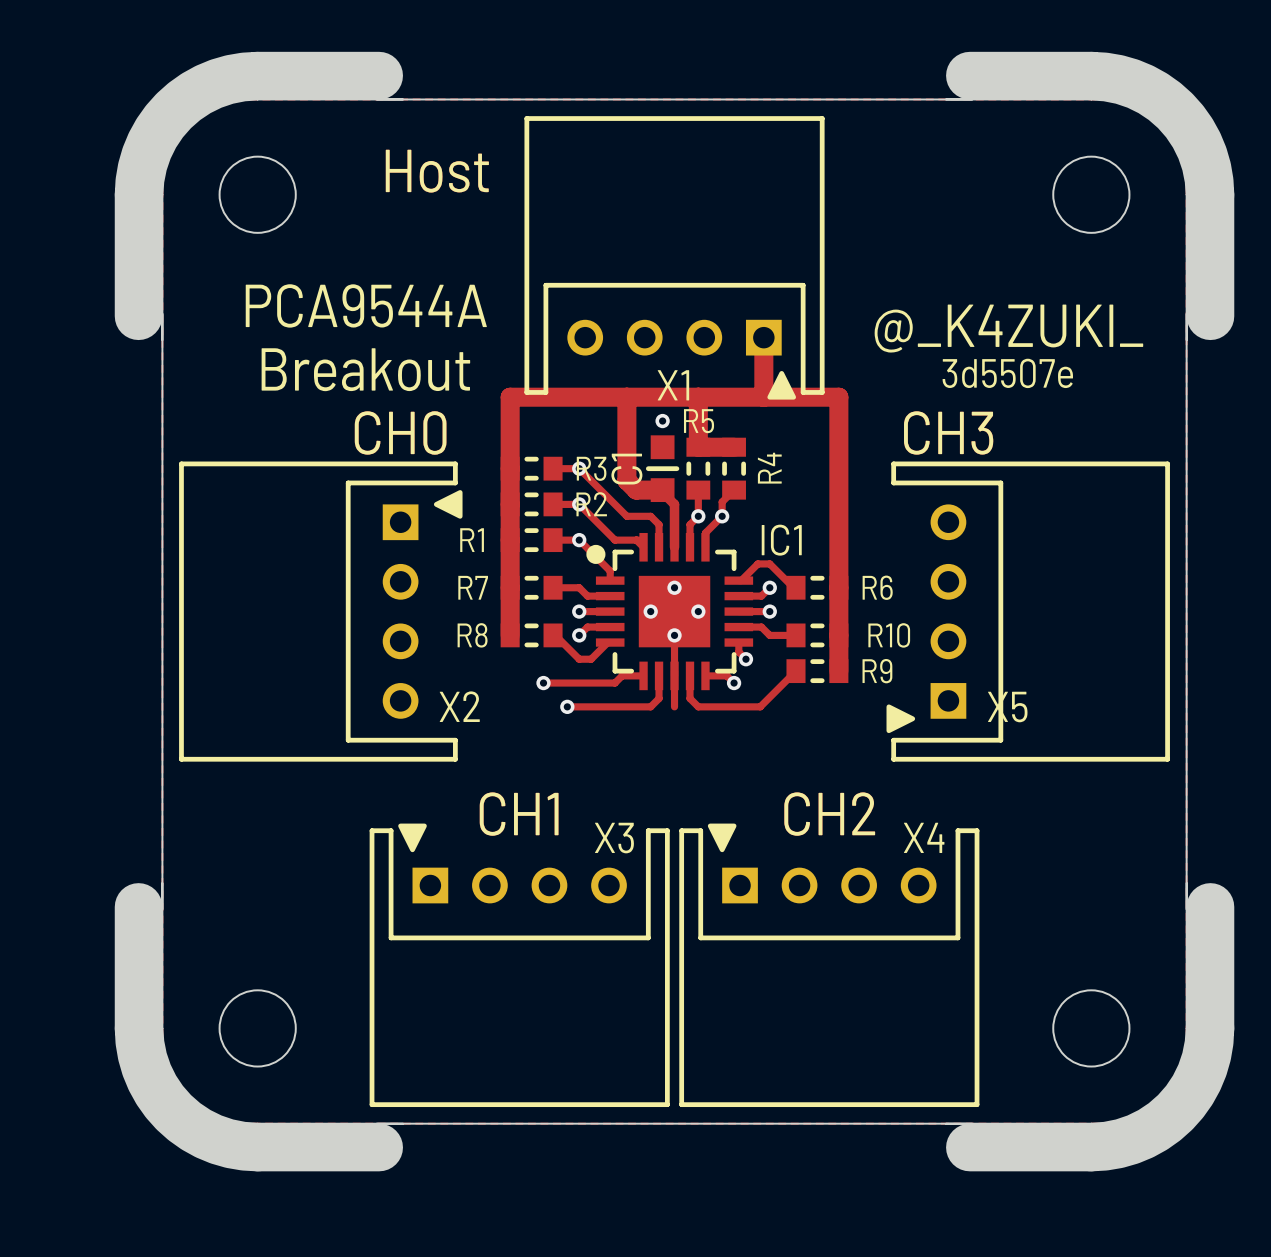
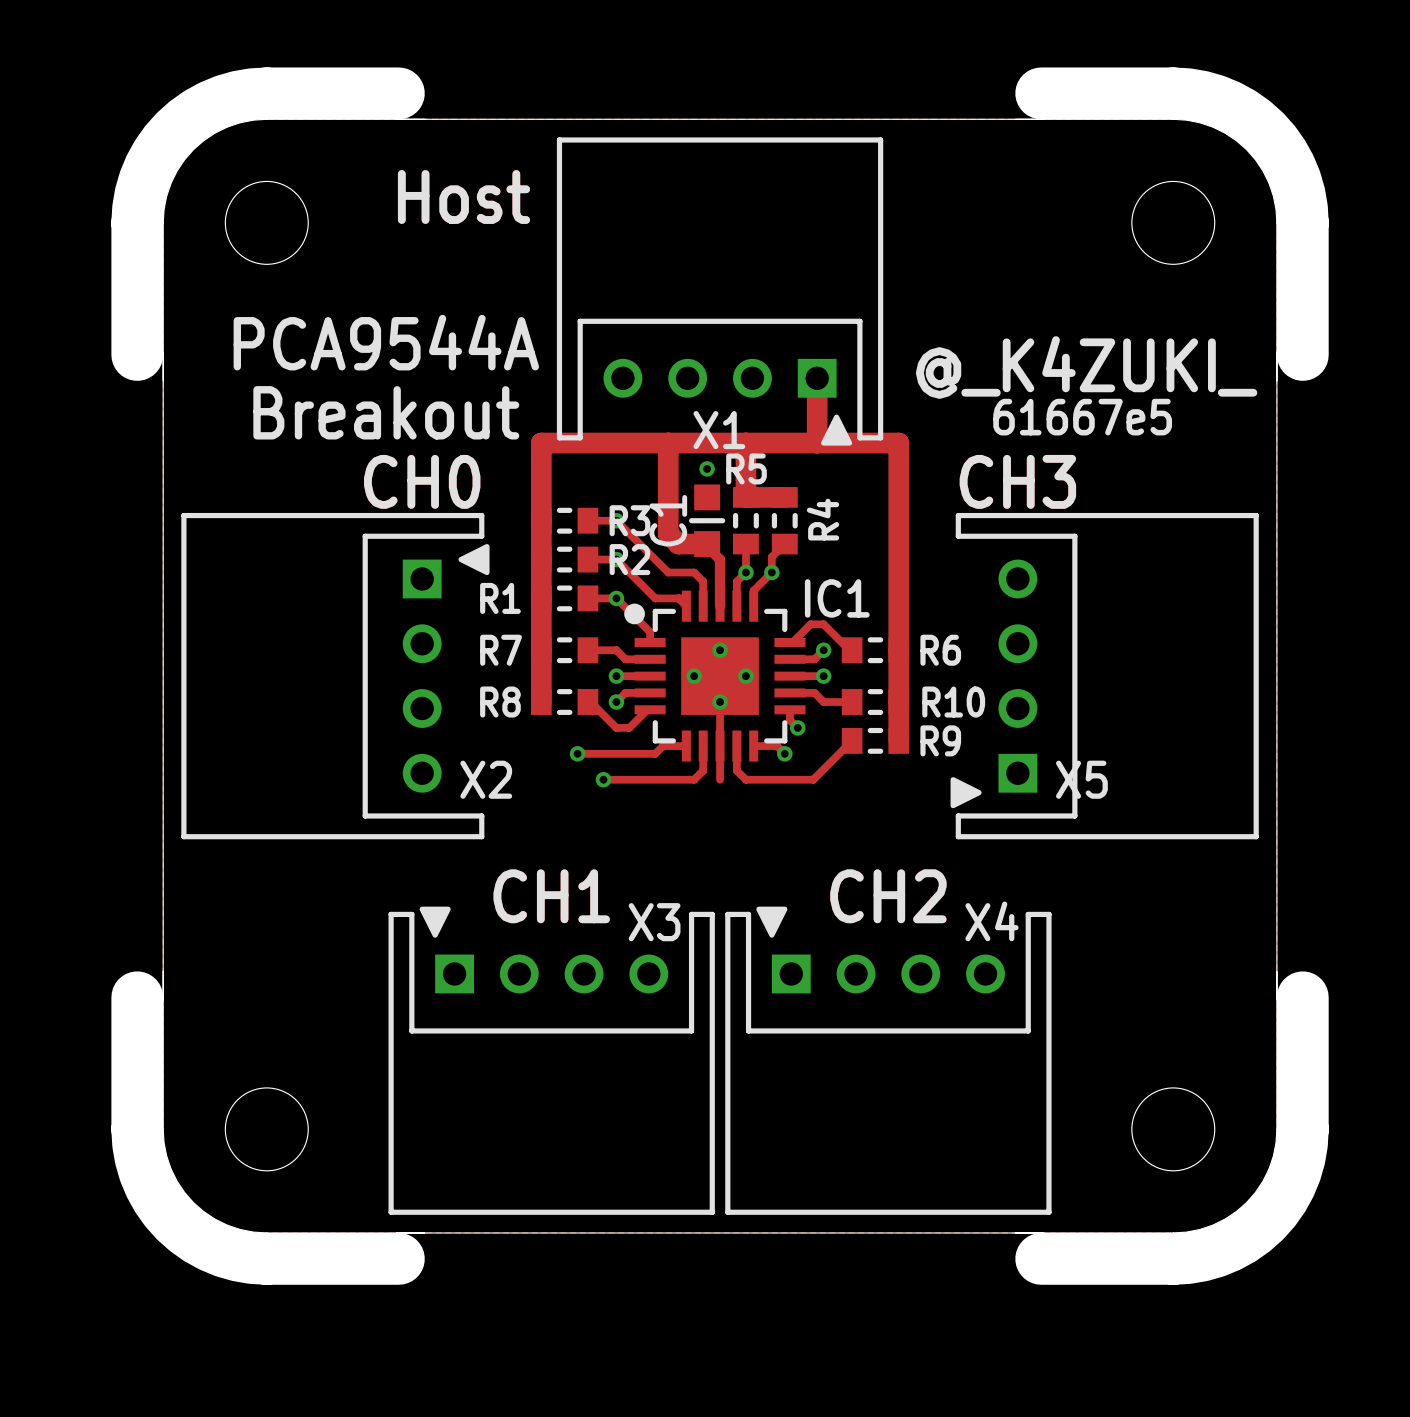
drawing shape: [942, 358, 1074, 389] -> [993, 398, 1173, 436]

